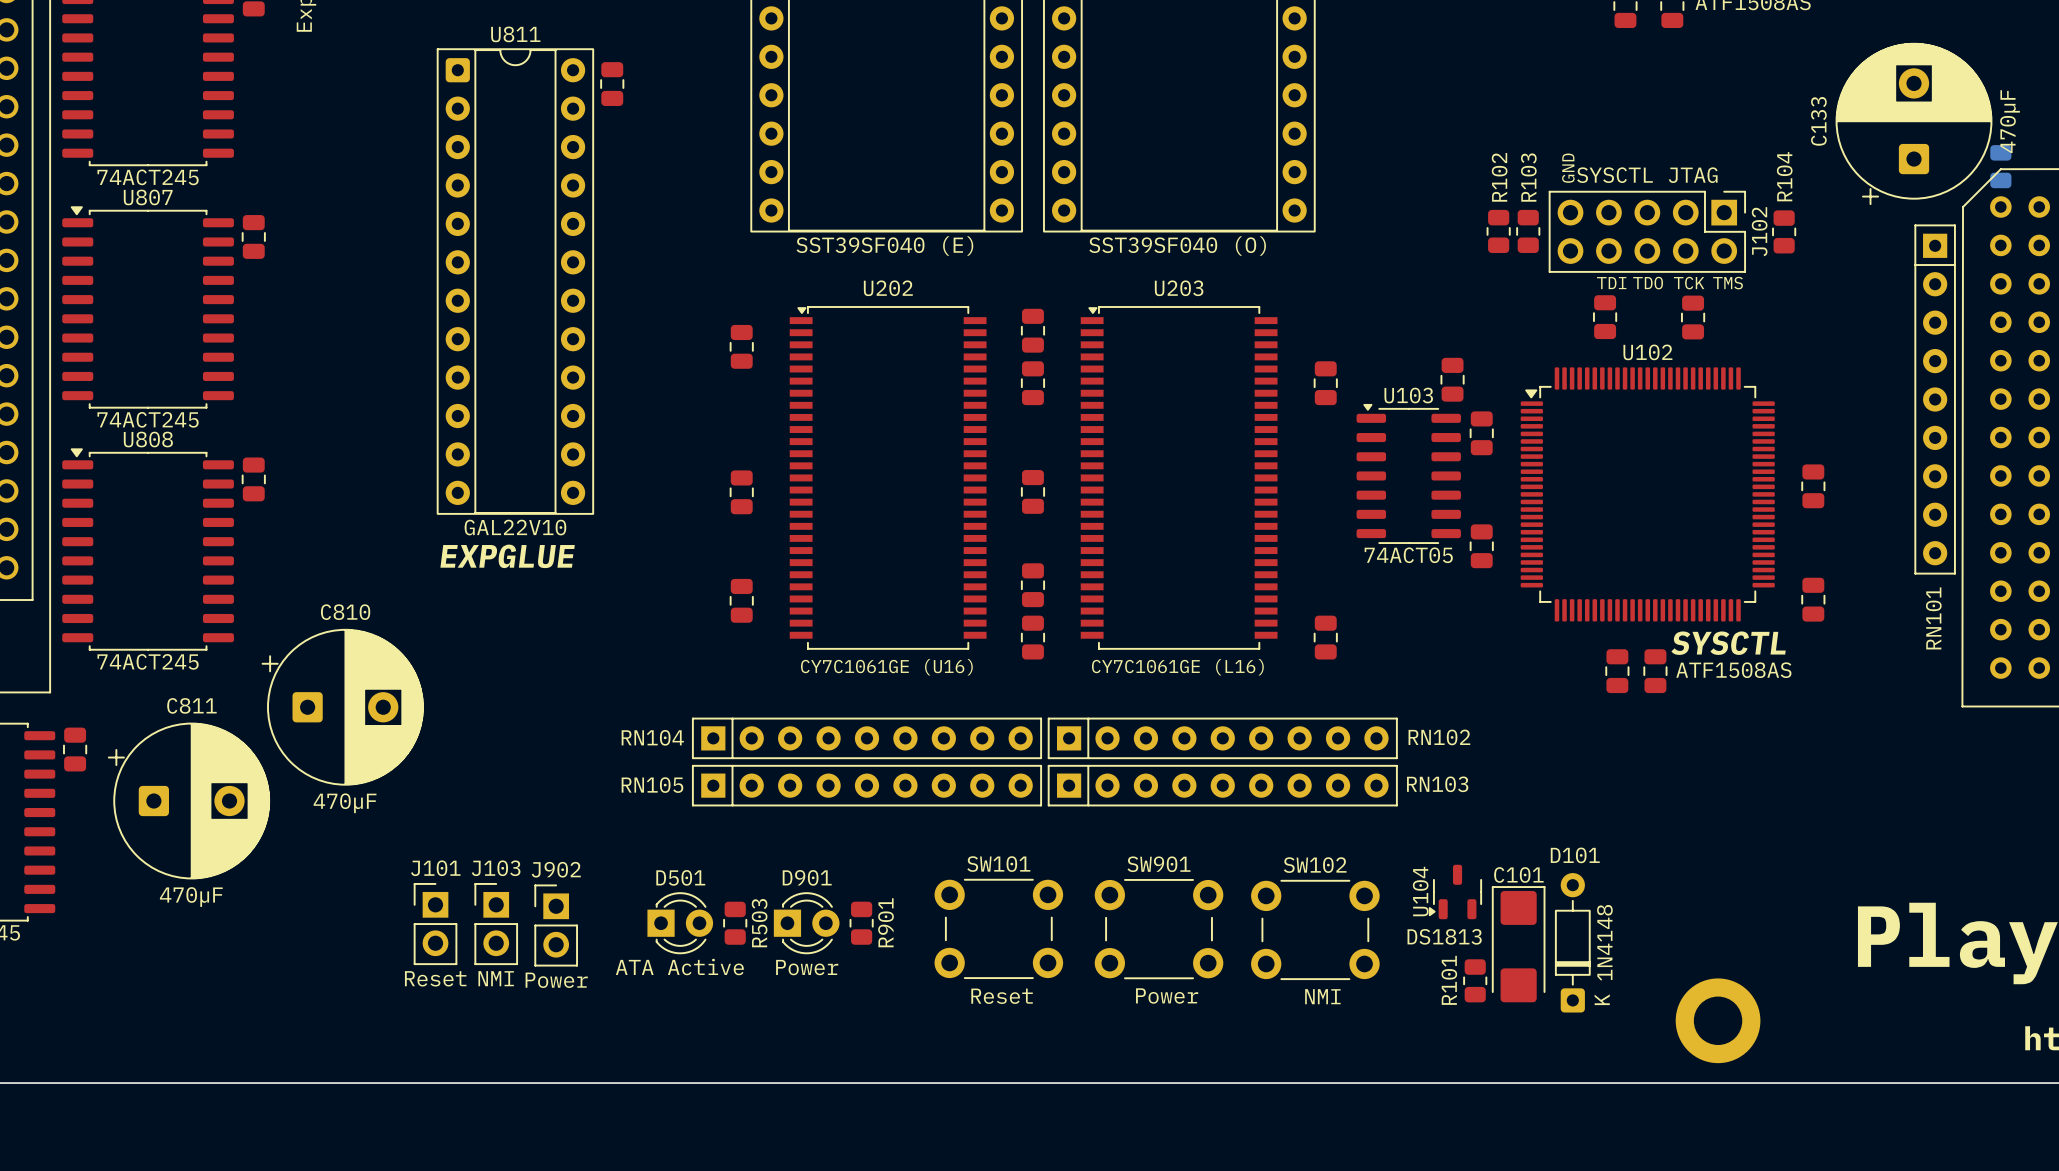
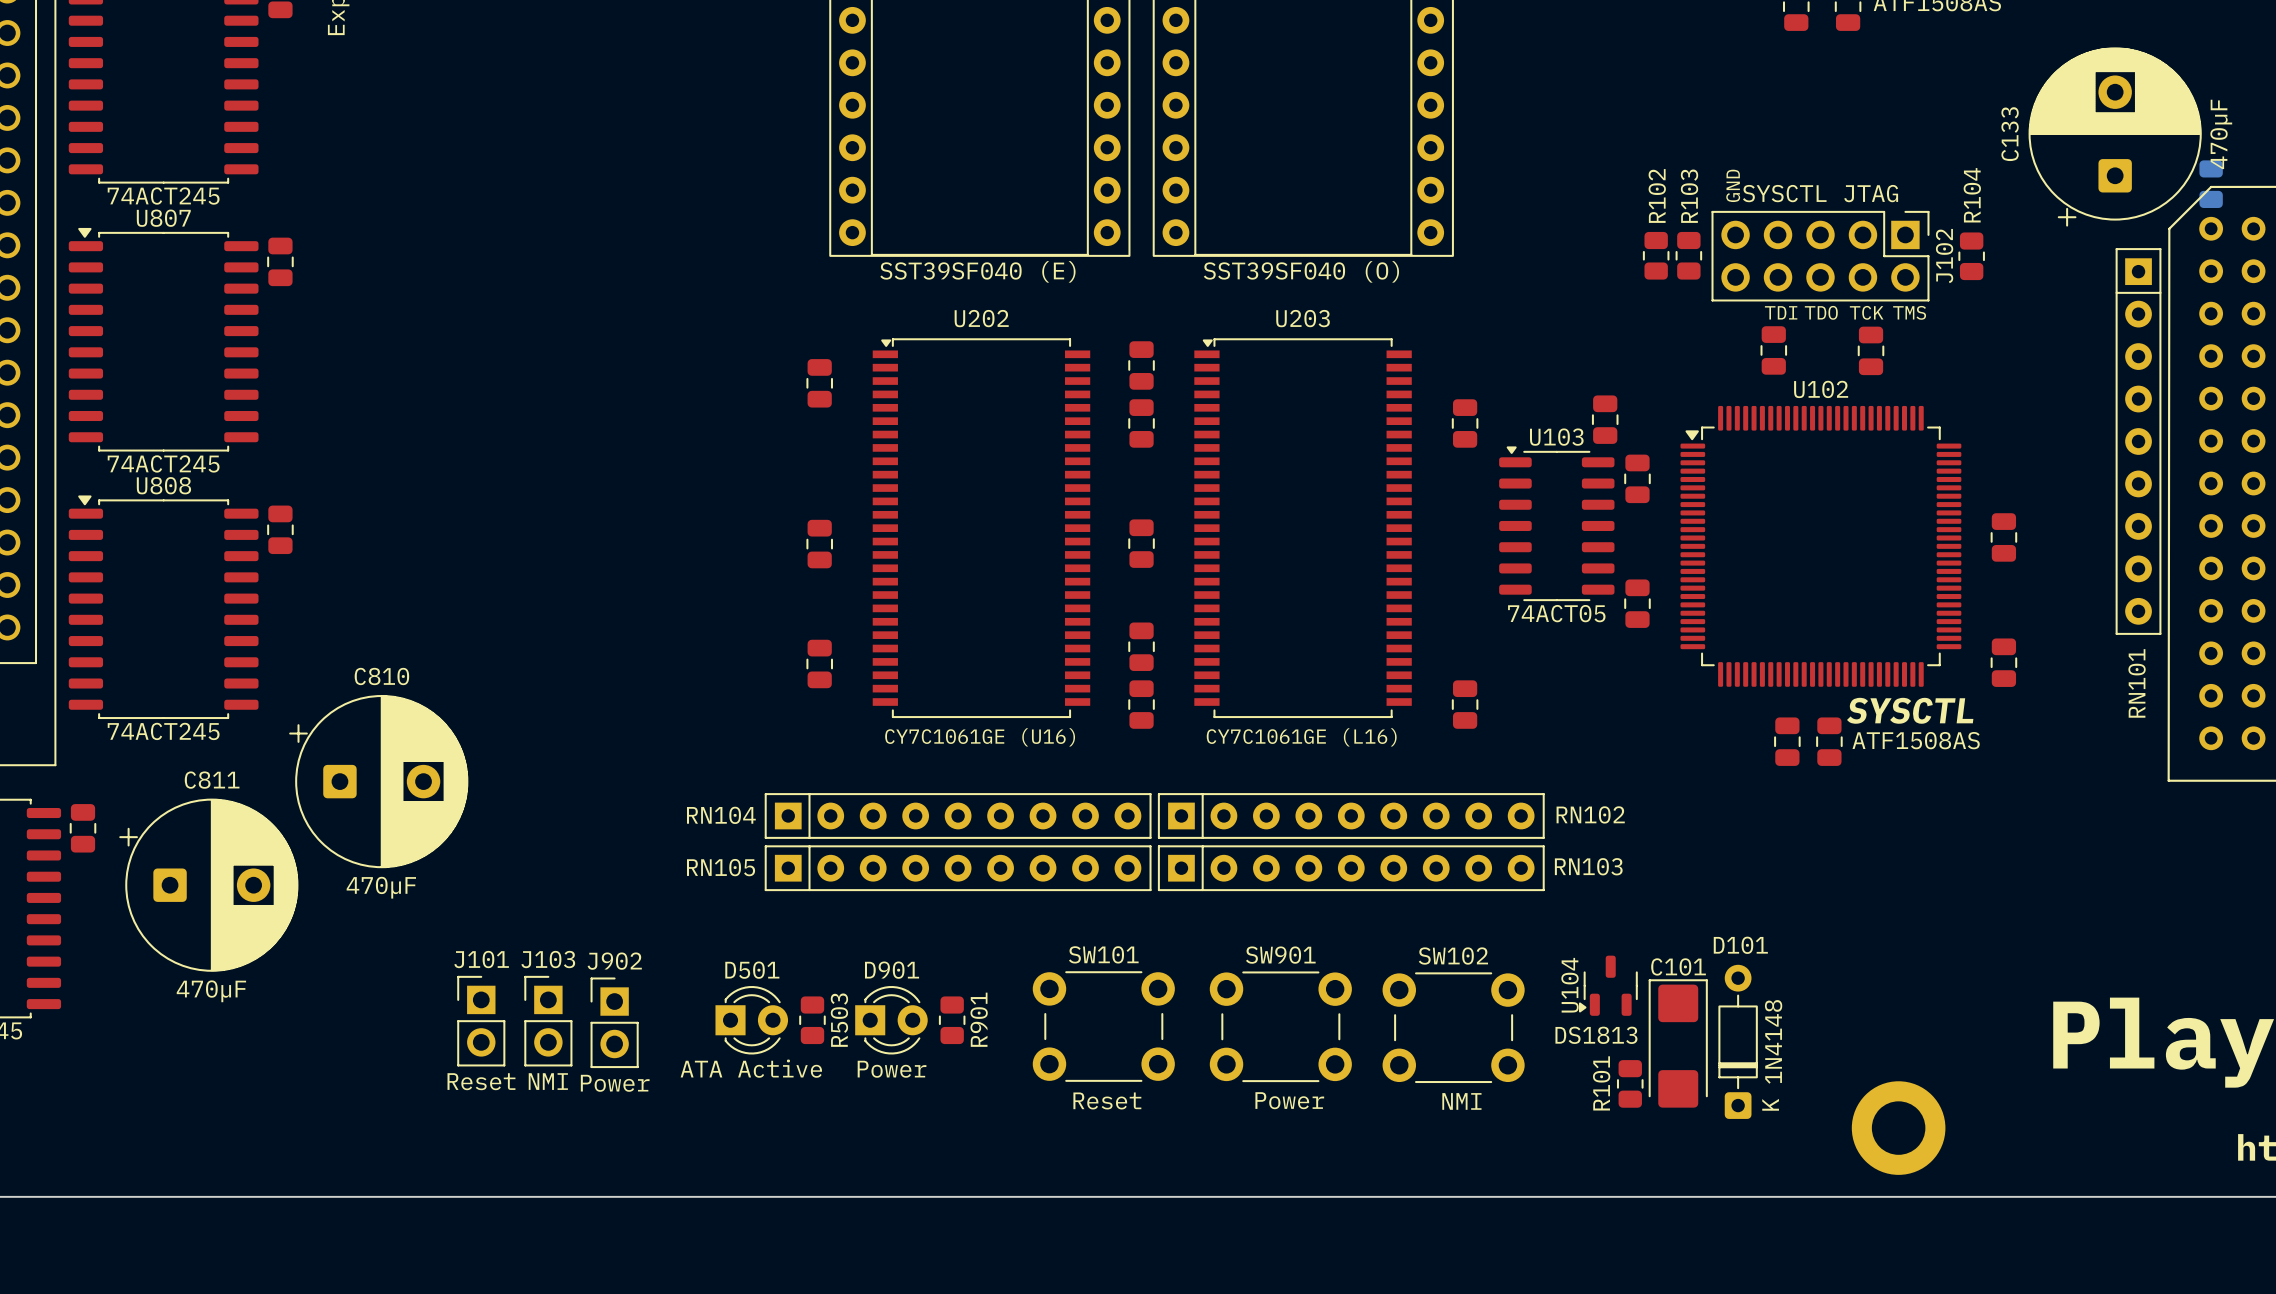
part: (612, 84) -> none
U811: GAL22V10 (515, 281) -> none
text: EXPGLUE (507, 556) -> none

